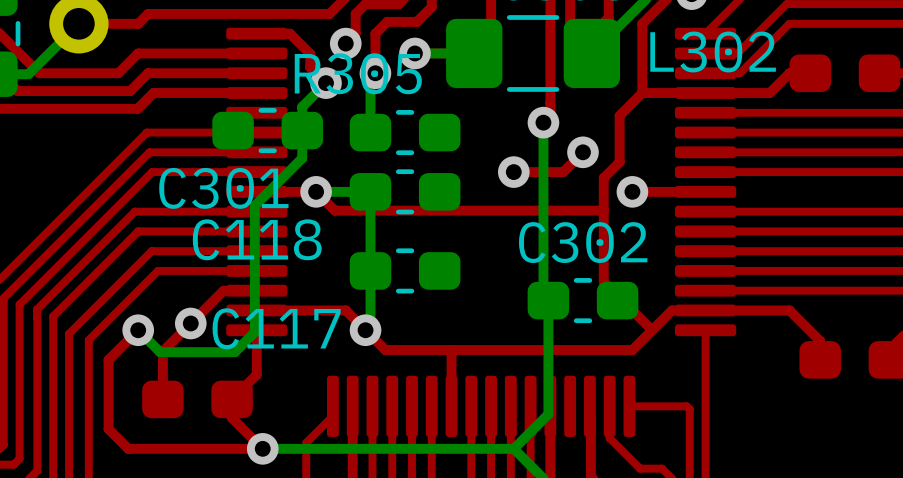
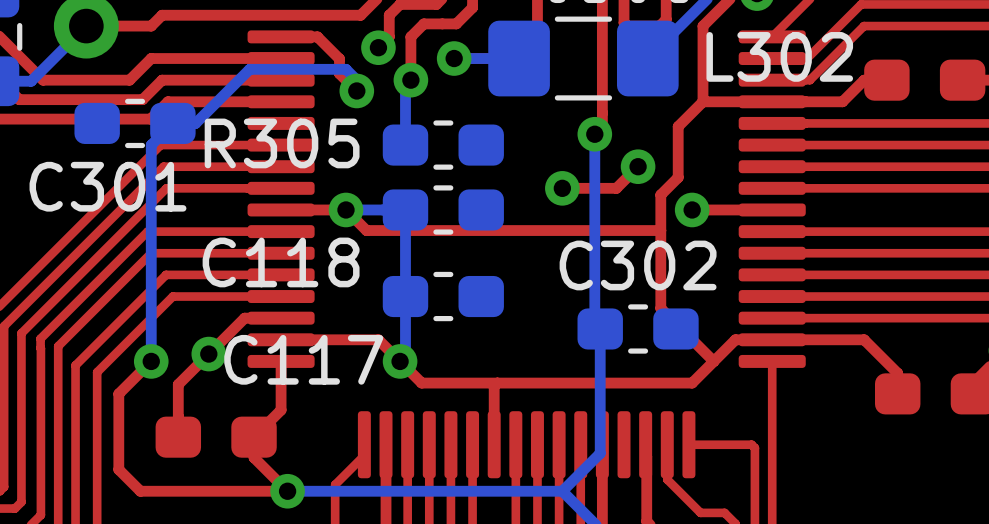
R305 name position: R305 (358, 73) -> R305 (282, 143)
bottom track: (326, 83) (302, 106) (302, 158) (254, 205) (254, 332) (234, 352) (160, 352) (138, 330) -> (356, 80) (345, 69) (249, 69) (195, 123) (172, 123) (151, 145) (151, 361)
C301 position: (267, 130) -> (135, 123)
C301 name position: C301 (223, 188) -> C301 (107, 186)

